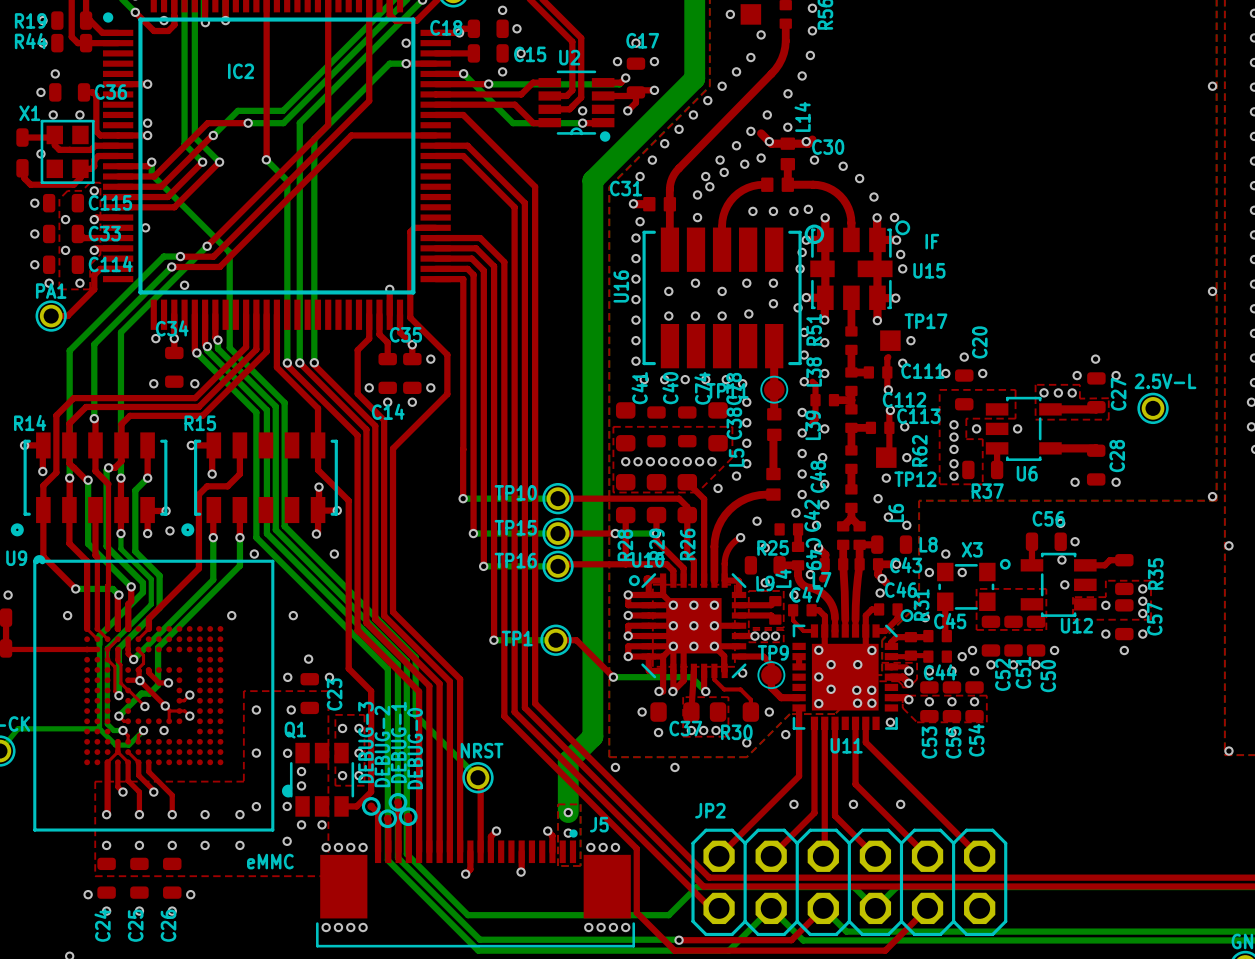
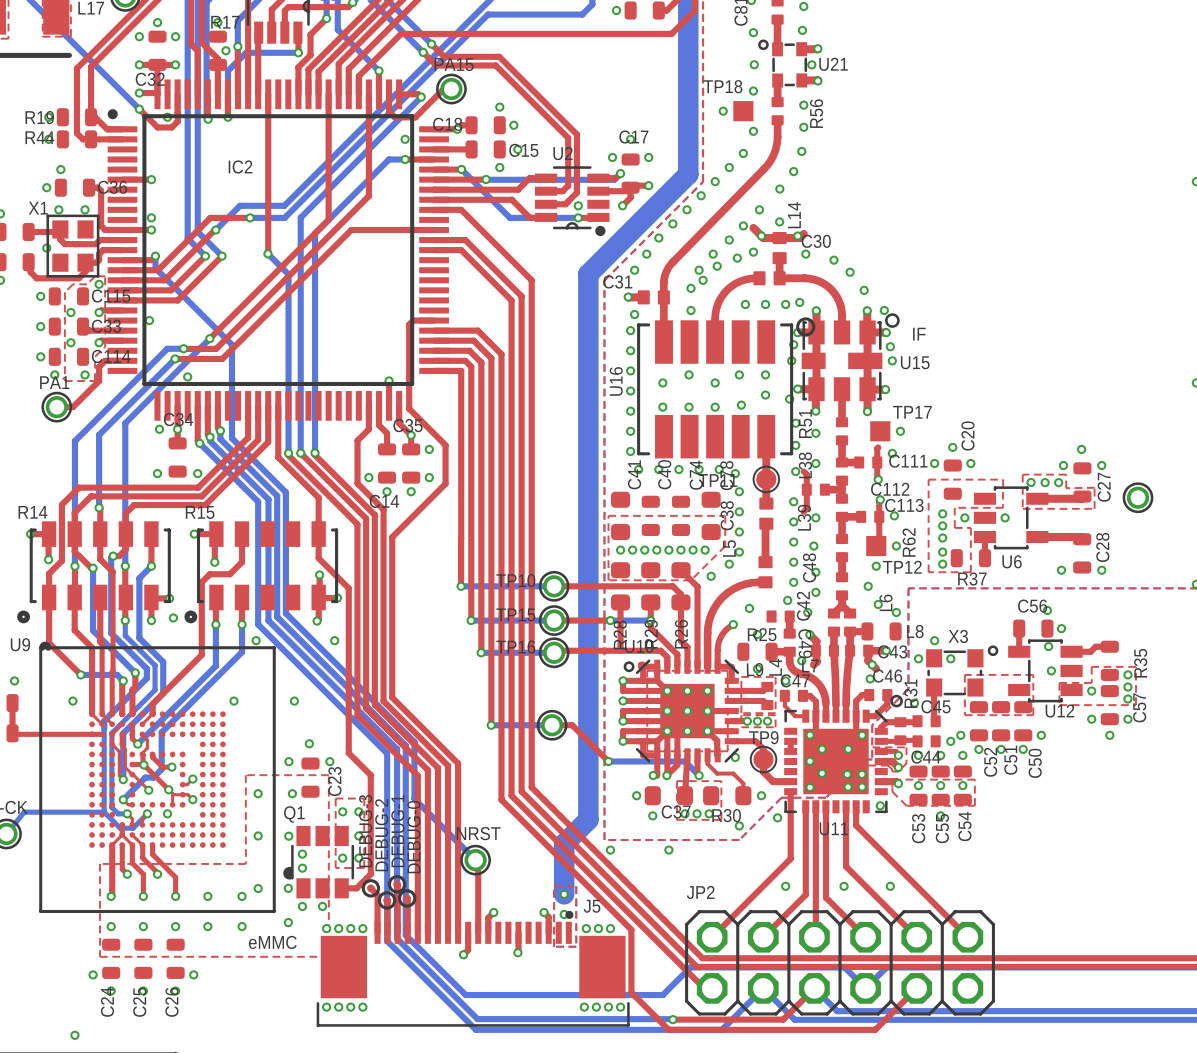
2.5V-L name: 2.5V-L (1165, 381) -> none
TP1 name: TP1 (517, 638) -> none

